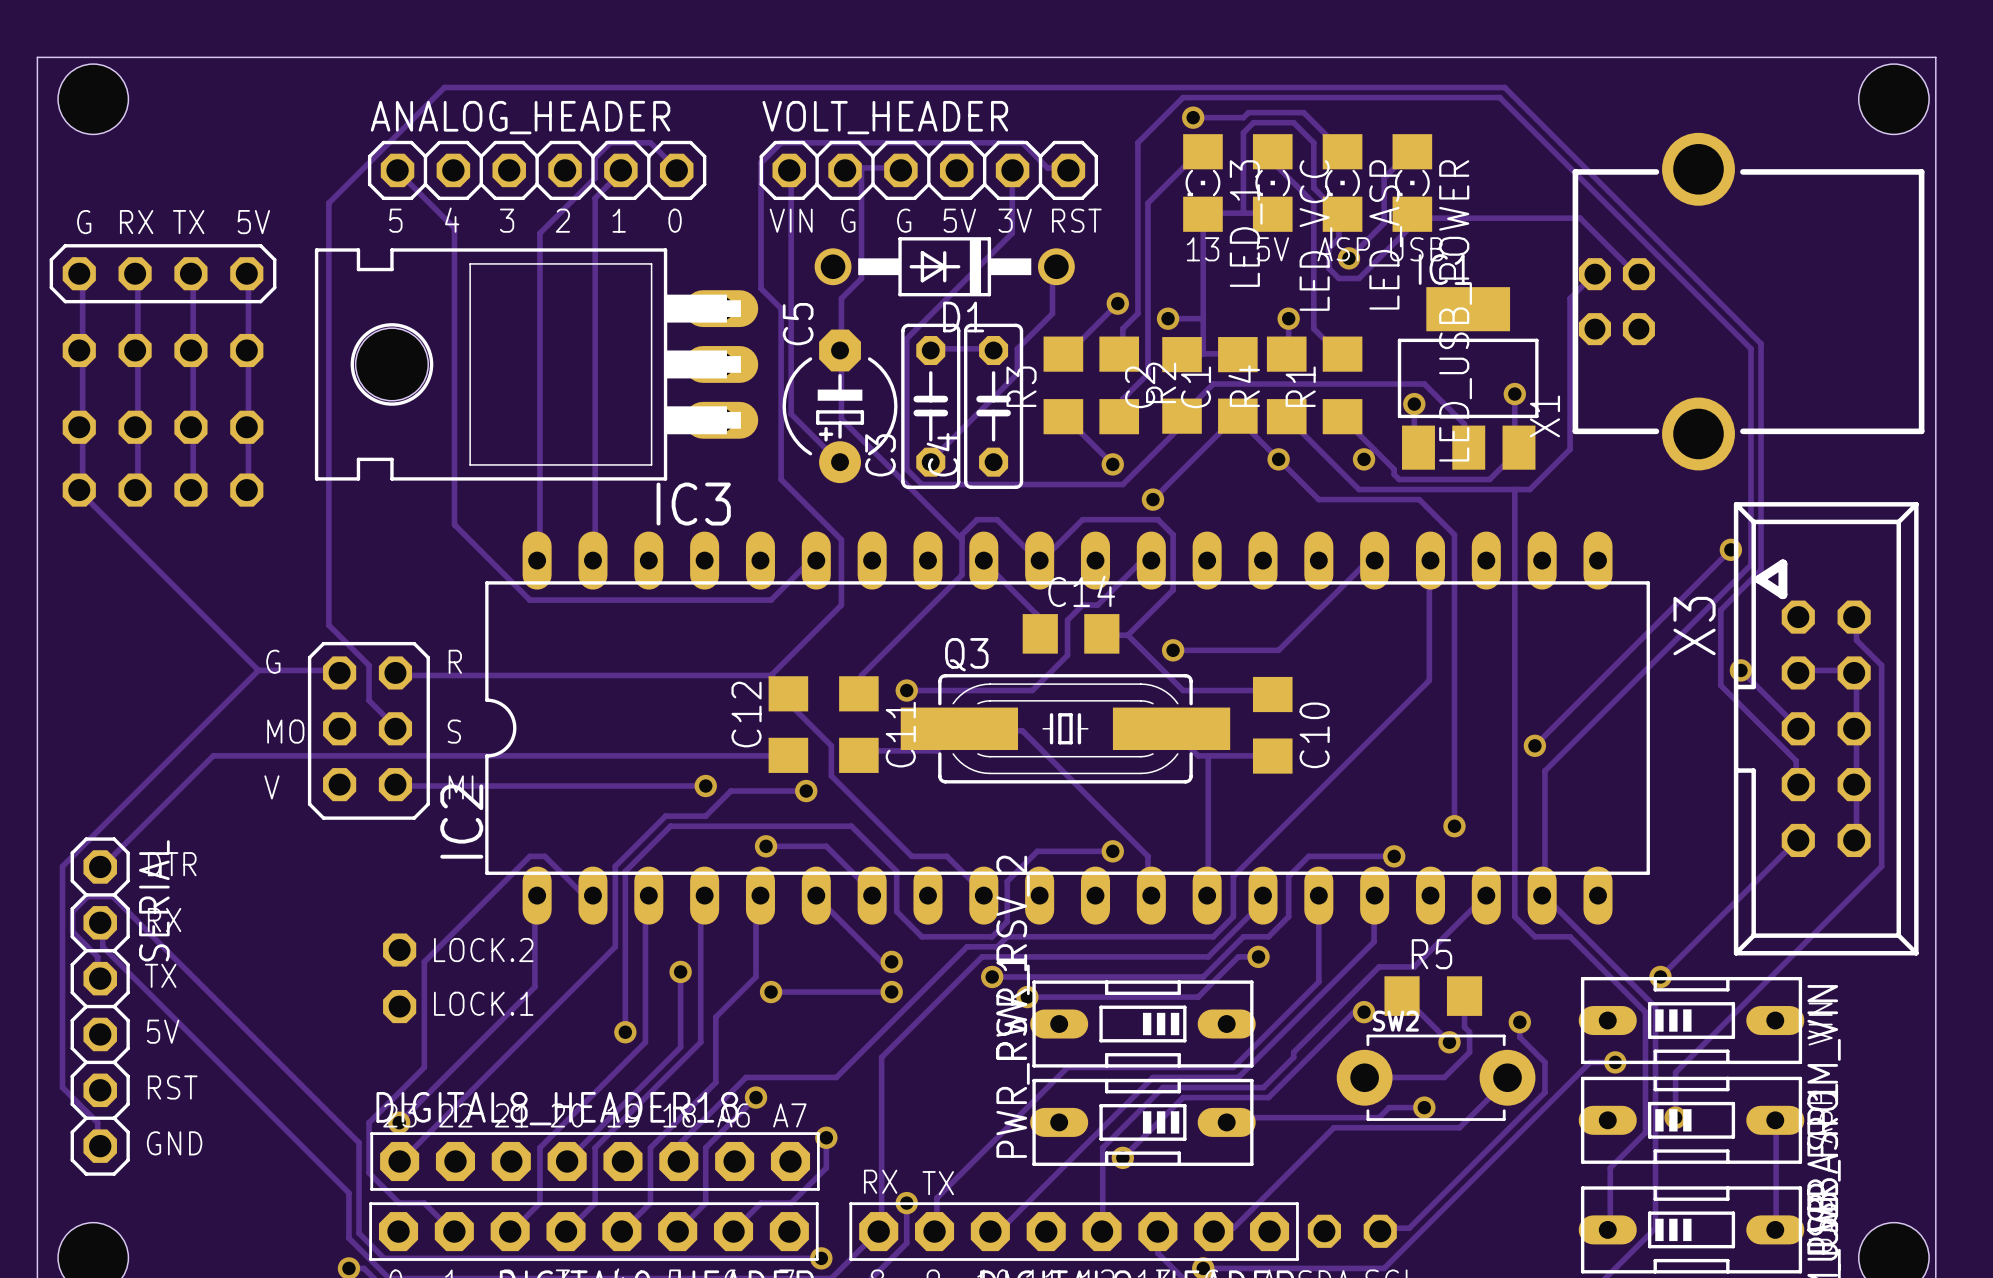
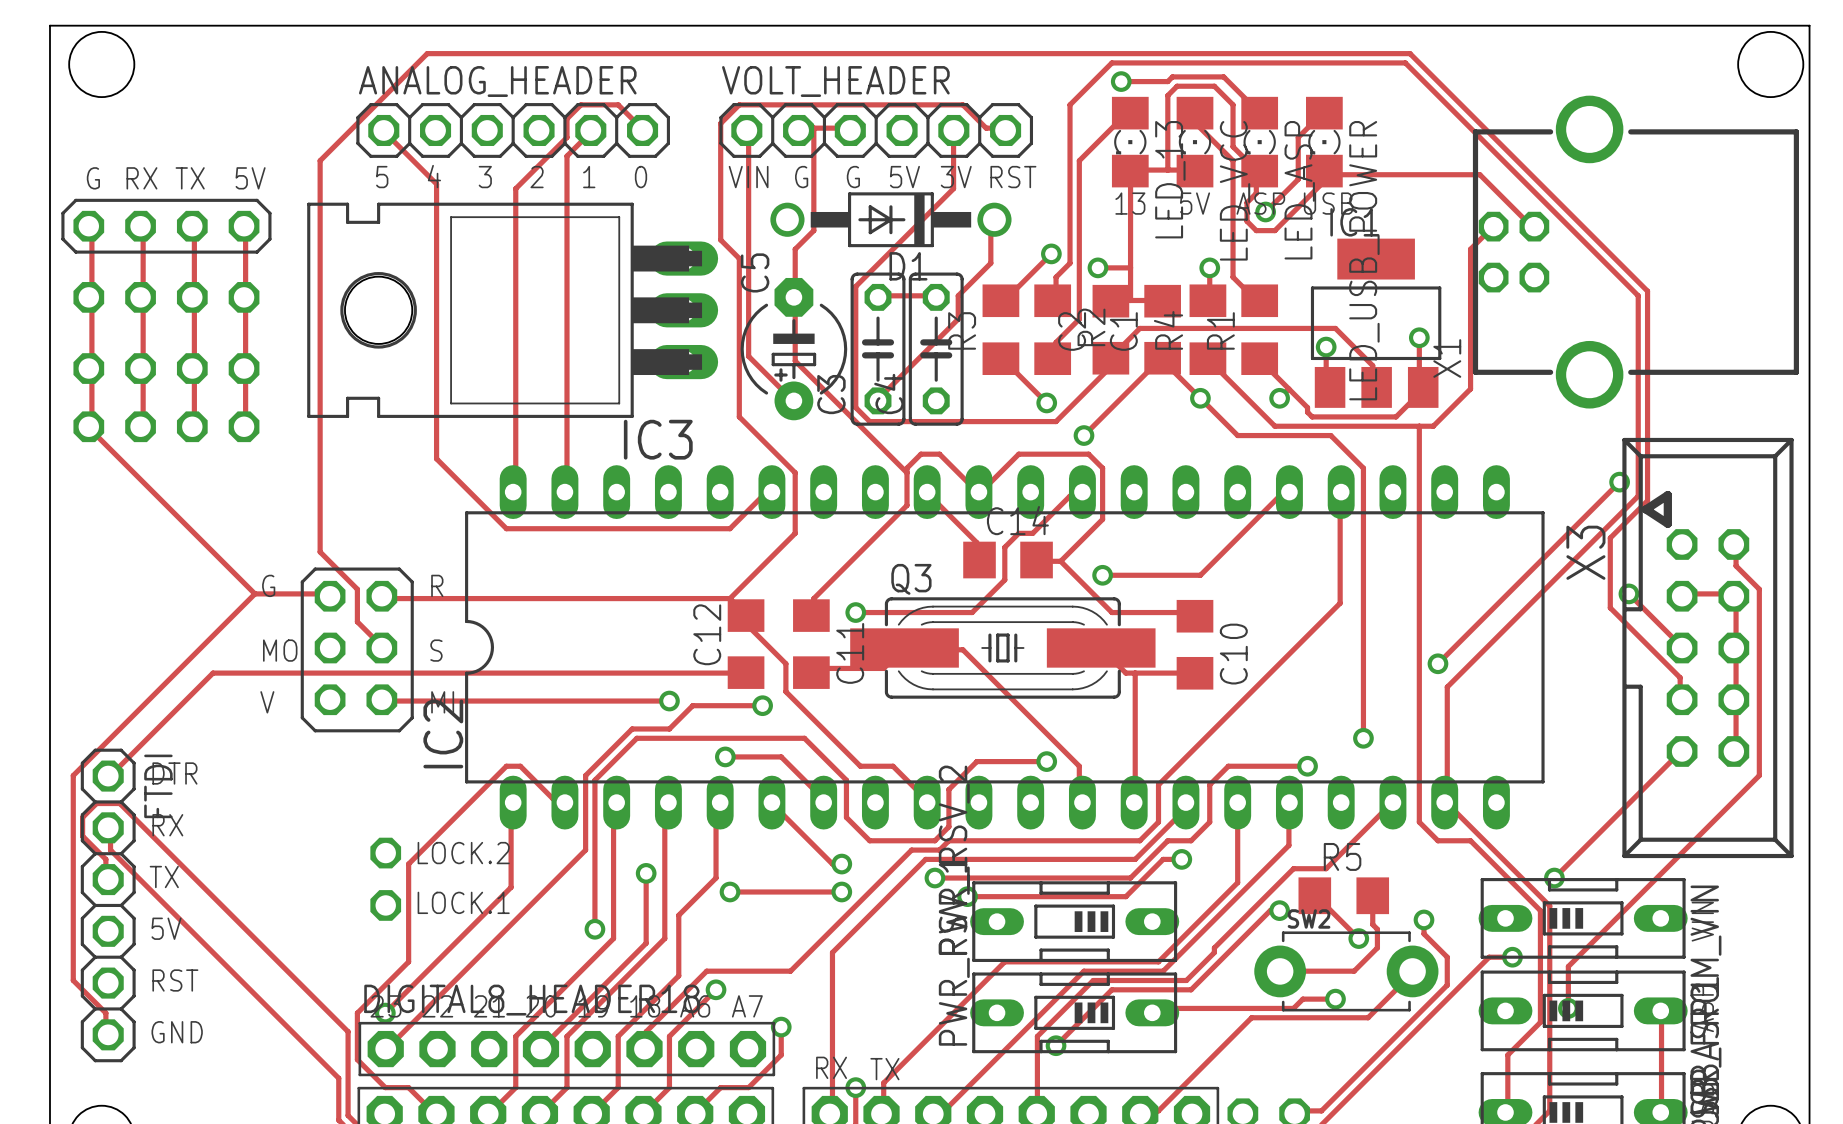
SERIAL name: SERIAL (154, 900) -> FTDI (158, 786)

